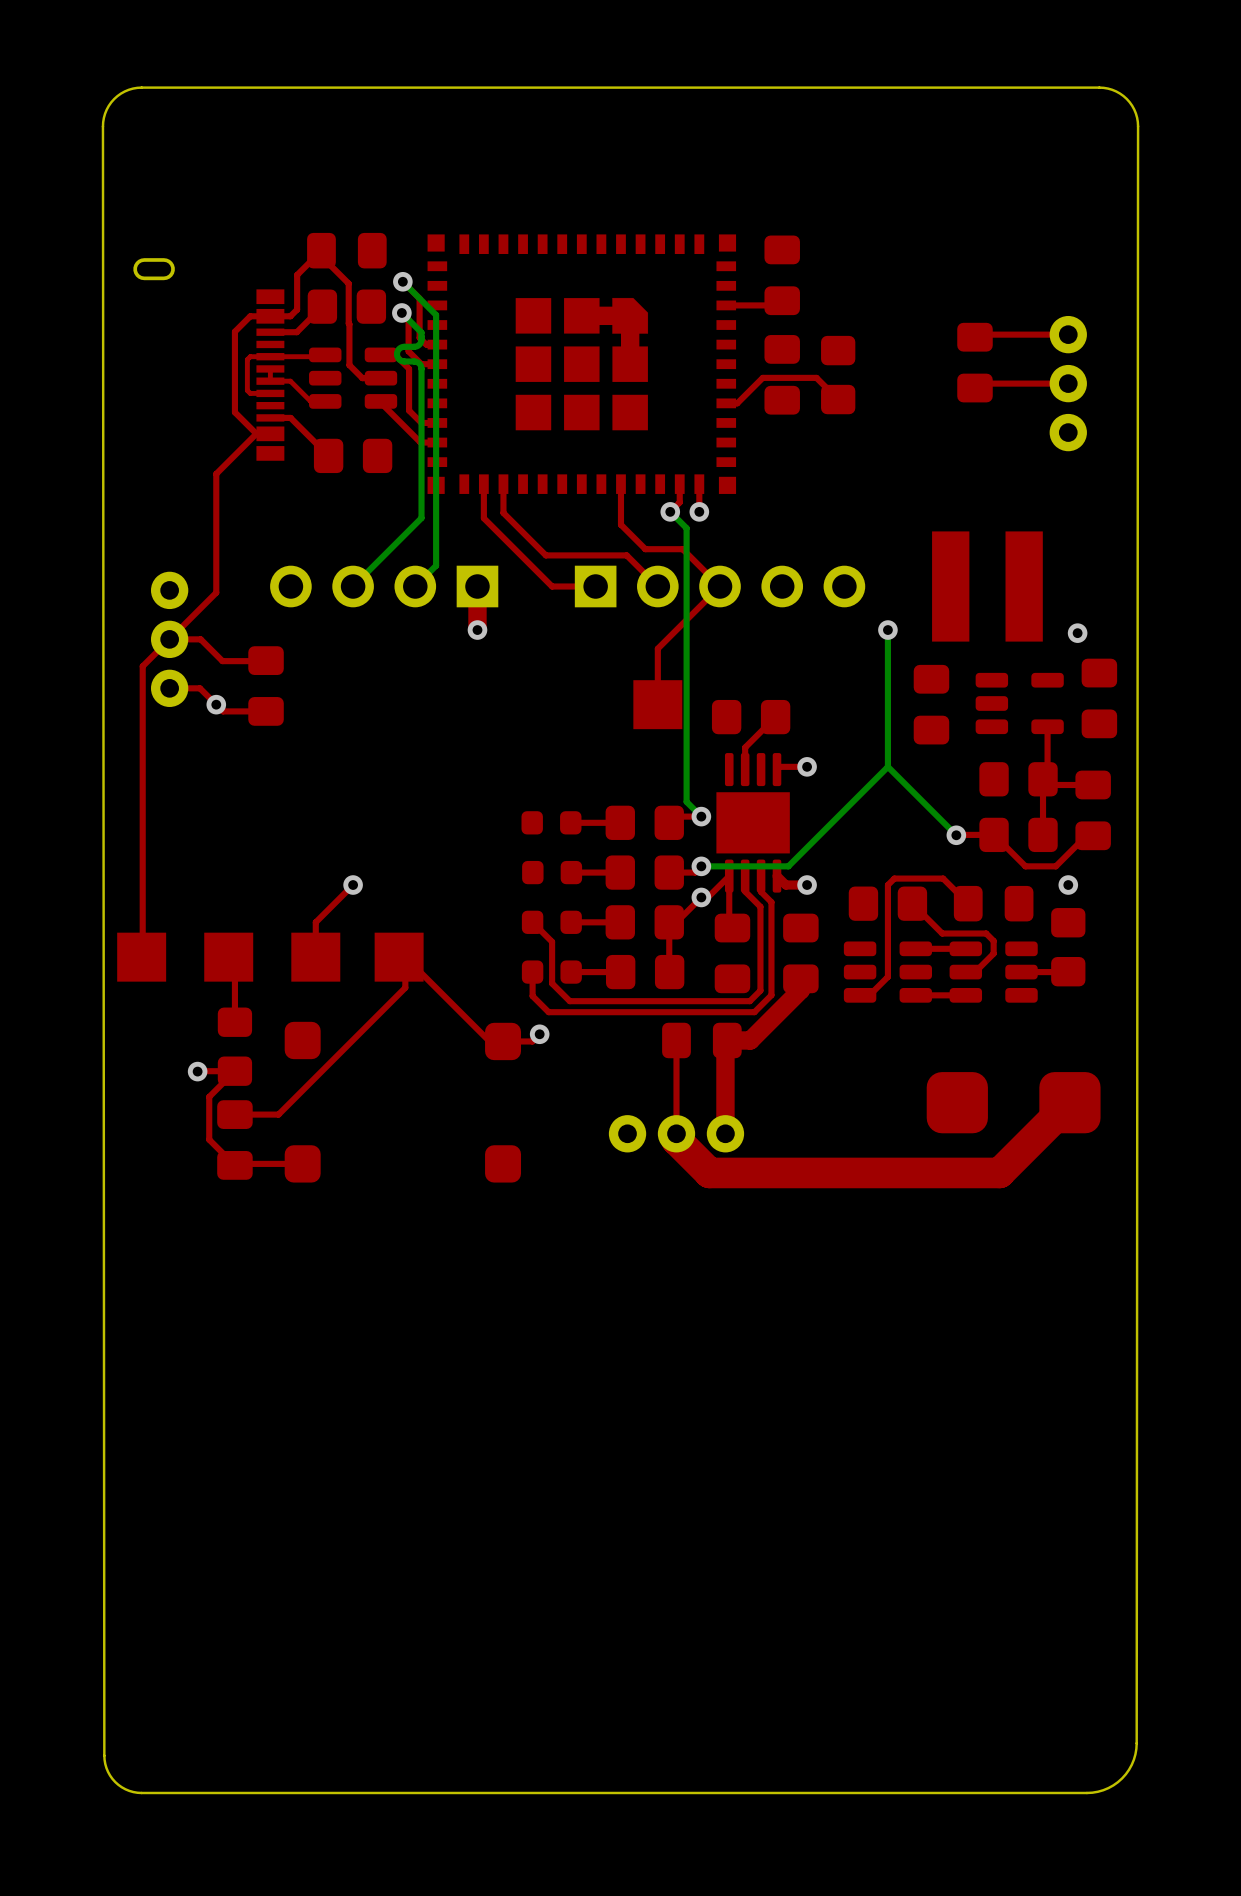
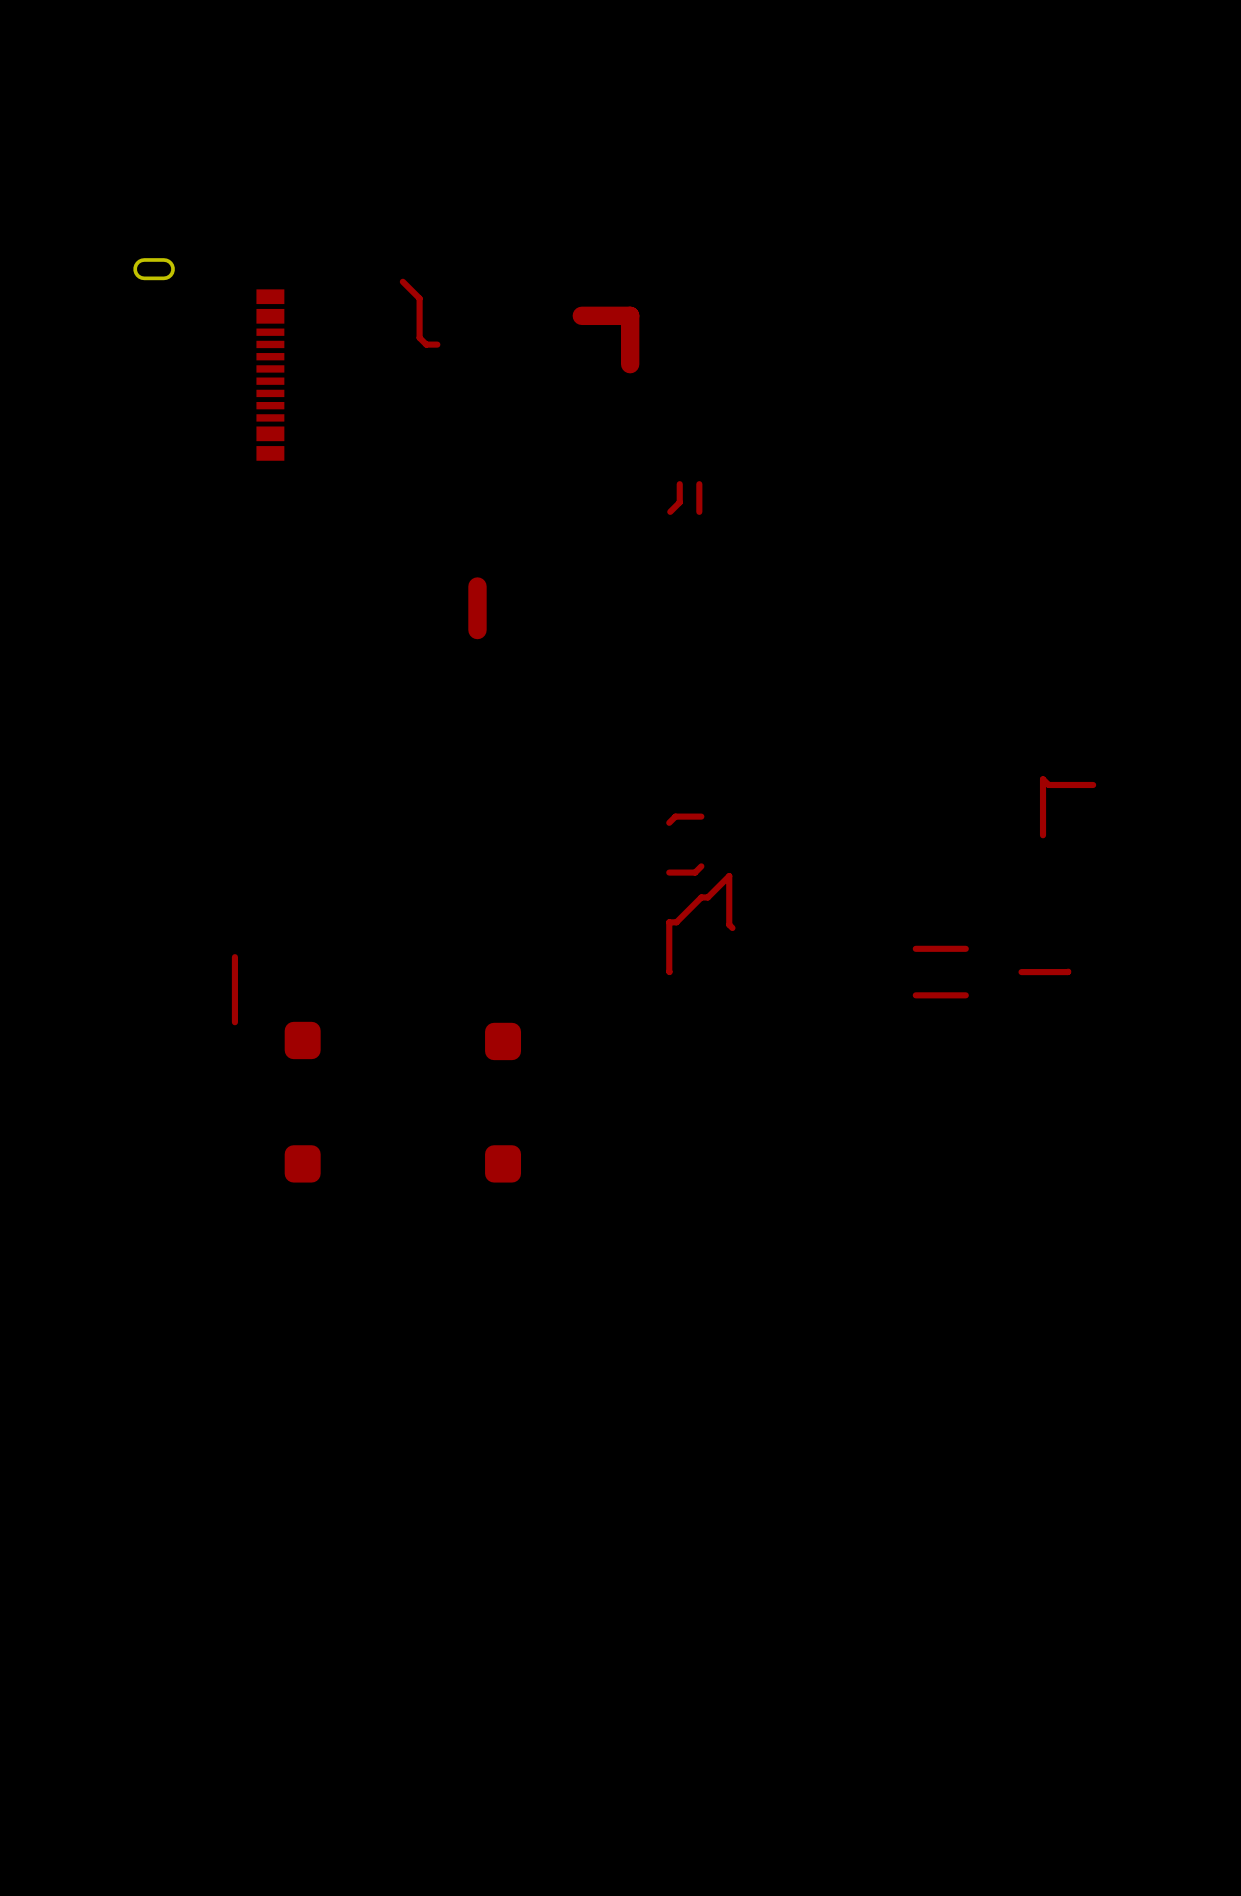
board edge: (1099, 87) (141, 87) (120, 93) (108, 105) (102, 126) (104, 1755) (108, 1771) (121, 1787) (141, 1792) (1086, 1792) (1103, 1790) (1113, 1785) (1129, 1769) (1135, 1754) (1136, 1743) (1138, 126) (1135, 113) (1126, 98) (1112, 89) (1099, 87) -> none
part: (346, 250) -> none
part: (782, 275) -> none
bottom track: (402, 281) (436, 315) (436, 565) (415, 586) -> none
via: (402, 281) -> none
top track: (782, 300) (777, 305) (726, 305) -> none
top track: (322, 306) (296, 332) (270, 332) -> none
part: (346, 306) -> none
top track: (401, 312) (408, 319) (408, 351) (421, 364) (437, 364) -> none
bottom track: (401, 312) (421, 332) (419, 344) (401, 347) (397, 354) (400, 360) (416, 362) (421, 367) (421, 518) (353, 586) -> none
via: (401, 312) -> none
top track: (1068, 334) (977, 334) (975, 337) -> none
top track: (325, 354) (323, 356) (250, 356) (247, 359) (247, 390) (250, 393) (270, 393) -> none
top track: (380, 354) (395, 354) (409, 368) (409, 410) (421, 422) (437, 422) -> none
part: (975, 362) -> none
part: (581, 364) -> none
top track: (270, 368) (270, 381) (290, 381) (310, 401) (325, 401) -> none
part: (782, 374) -> none
part: (838, 375) -> none
part: (353, 378) -> none
top track: (380, 378) (362, 378) (349, 365) (348, 283) (321, 256) (321, 250) (297, 275) (297, 309) (290, 316) (250, 316) (234, 331) (234, 412) (256, 433) -> none
top track: (1068, 383) (979, 383) (975, 388) -> none
part: (1068, 383) -> none
top track: (838, 399) (816, 377) (762, 377) (737, 403) (726, 403) -> none
top track: (380, 401) (420, 442) (437, 442) -> none
top track: (270, 417) (290, 417) (328, 455) -> none
top track: (256, 433) (216, 473) (216, 592) (142, 666) (142, 951) -> none
part: (353, 455) -> none
top track: (483, 484) (483, 518) (552, 586) (595, 586) -> none
top track: (503, 484) (503, 512) (545, 555) (626, 555) (657, 586) -> none
top track: (620, 484) (620, 524) (645, 549) (682, 549) (720, 586) (657, 648) (657, 704) -> none
bottom track: (670, 511) (686, 528) (686, 801) (701, 816) -> none
via: (670, 511) -> none
via: (699, 511) -> none
part: (384, 586) -> none
part: (720, 586) -> none
part: (987, 586) -> none
via: (477, 630) -> none
bottom track: (887, 630) (887, 766) -> none
via: (887, 630) -> none
via: (1077, 633) -> none
top track: (169, 639) (200, 639) (222, 661) (266, 660) -> none
part: (169, 639) -> none
part: (266, 686) -> none
top track: (169, 688) (199, 688) (223, 711) (266, 711) -> none
part: (1099, 698) -> none
part: (1019, 703) -> none
via: (216, 704) -> none
part: (657, 704) -> none
part: (931, 704) -> none
part: (751, 717) -> none
top track: (775, 717) (745, 747) (745, 769) -> none
top track: (1047, 726) (1047, 774) (1043, 779) -> none
top track: (807, 766) (779, 766) (777, 769) -> none
via: (807, 766) -> none
bottom track: (887, 766) (956, 835) -> none
bottom track: (887, 766) (788, 866) (701, 866) -> none
part: (1018, 779) -> none
part: (1093, 810) -> none
via: (701, 816) -> none
part: (551, 822) -> none
top track: (620, 822) (570, 822) -> none
part: (644, 822) -> none
part: (753, 822) -> none
part: (1018, 834) -> none
top track: (956, 835) (994, 834) (1025, 866) (1055, 866) (1086, 835) (1093, 835) -> none
via: (956, 835) -> none
via: (701, 866) -> none
part: (552, 872) -> none
top track: (620, 872) (571, 872) -> none
part: (644, 872) -> none
top track: (745, 876) (745, 891) (760, 906) (760, 990) (749, 1001) (569, 1001) (552, 983) (552, 941) (532, 922) -> none
top track: (761, 876) (761, 891) (771, 902) (771, 995) (754, 1012) (548, 1012) (532, 996) (532, 972) -> none
top track: (777, 876) (785, 885) (807, 885) -> none
top track: (353, 885) (315, 922) (315, 957) -> none
via: (353, 885) -> none
via: (807, 885) -> none
via: (1068, 885) -> none
via: (701, 897) -> none
part: (887, 903) -> none
top track: (912, 903) (942, 933) (986, 933) (993, 940) (993, 953) (975, 972) (965, 972) -> none
top track: (968, 903) (943, 878) (894, 878) (887, 885) (887, 976) (869, 995) (860, 995) -> none
part: (993, 903) -> none
part: (551, 922) -> none
top track: (620, 922) (571, 922) -> none
part: (644, 922) -> none
part: (1068, 947) -> none
part: (732, 953) -> none
part: (800, 953) -> none
part: (141, 957) -> none
part: (228, 957) -> none
part: (315, 957) -> none
part: (399, 957) -> none
part: (551, 972) -> none
top track: (620, 972) (571, 972) -> none
part: (645, 972) -> none
part: (887, 972) -> none
part: (993, 972) -> none
top track: (800, 978) (800, 990) (750, 1040) (727, 1040) (725, 1042) (725, 1133) -> none
top track: (539, 1034) (532, 1041) (489, 1041) (405, 957) (405, 987) (278, 1114) (234, 1114) -> none
via: (539, 1034) -> none
top track: (676, 1040) (676, 1139) (709, 1172) (999, 1172) (1069, 1102) -> none
part: (701, 1040) -> none
part: (234, 1046) -> none
top track: (197, 1071) (234, 1071) (209, 1096) (209, 1139) (234, 1165) (302, 1163) -> none
via: (197, 1071) -> none
part: (1013, 1102) -> none
part: (676, 1133) -> none
part: (234, 1139) -> none

